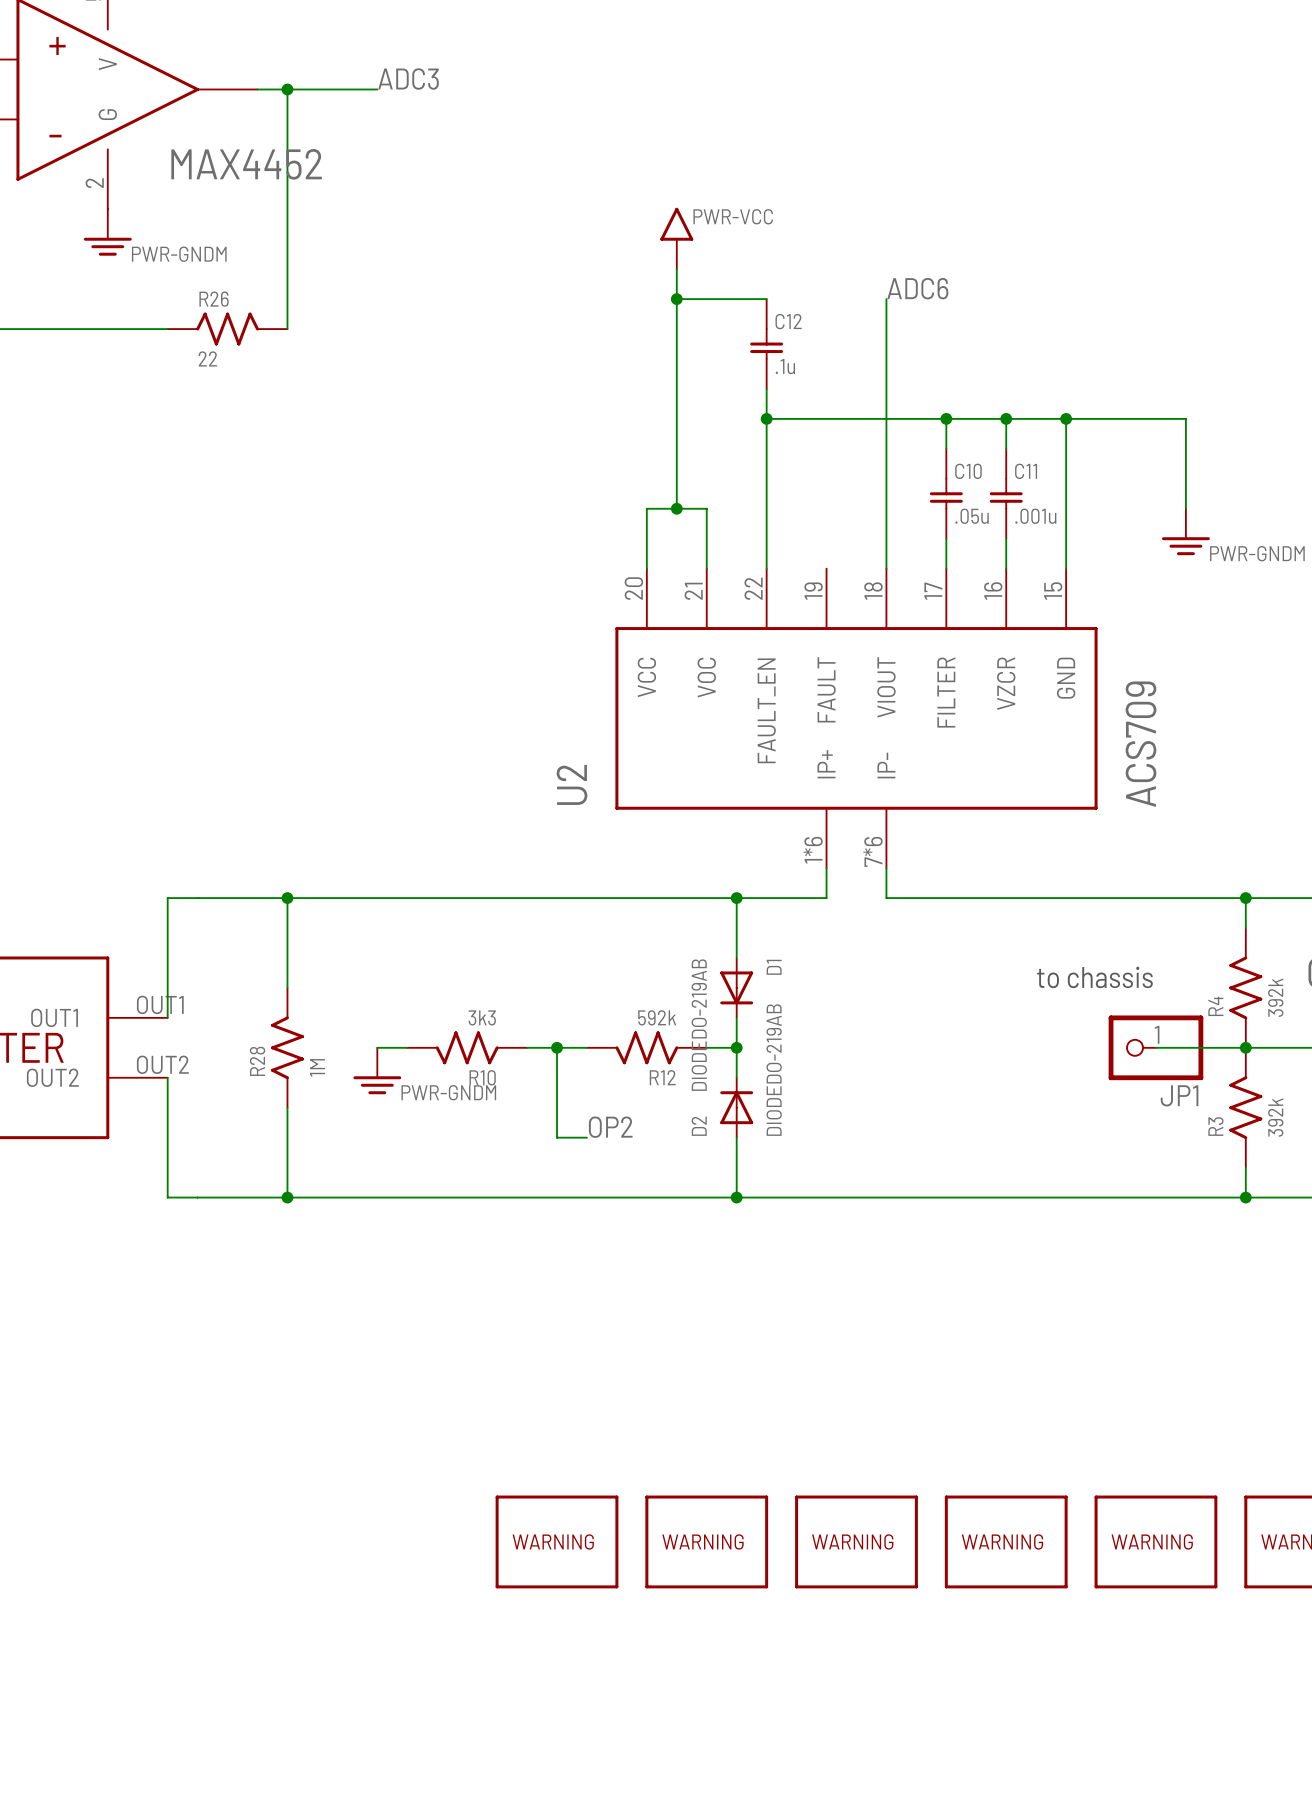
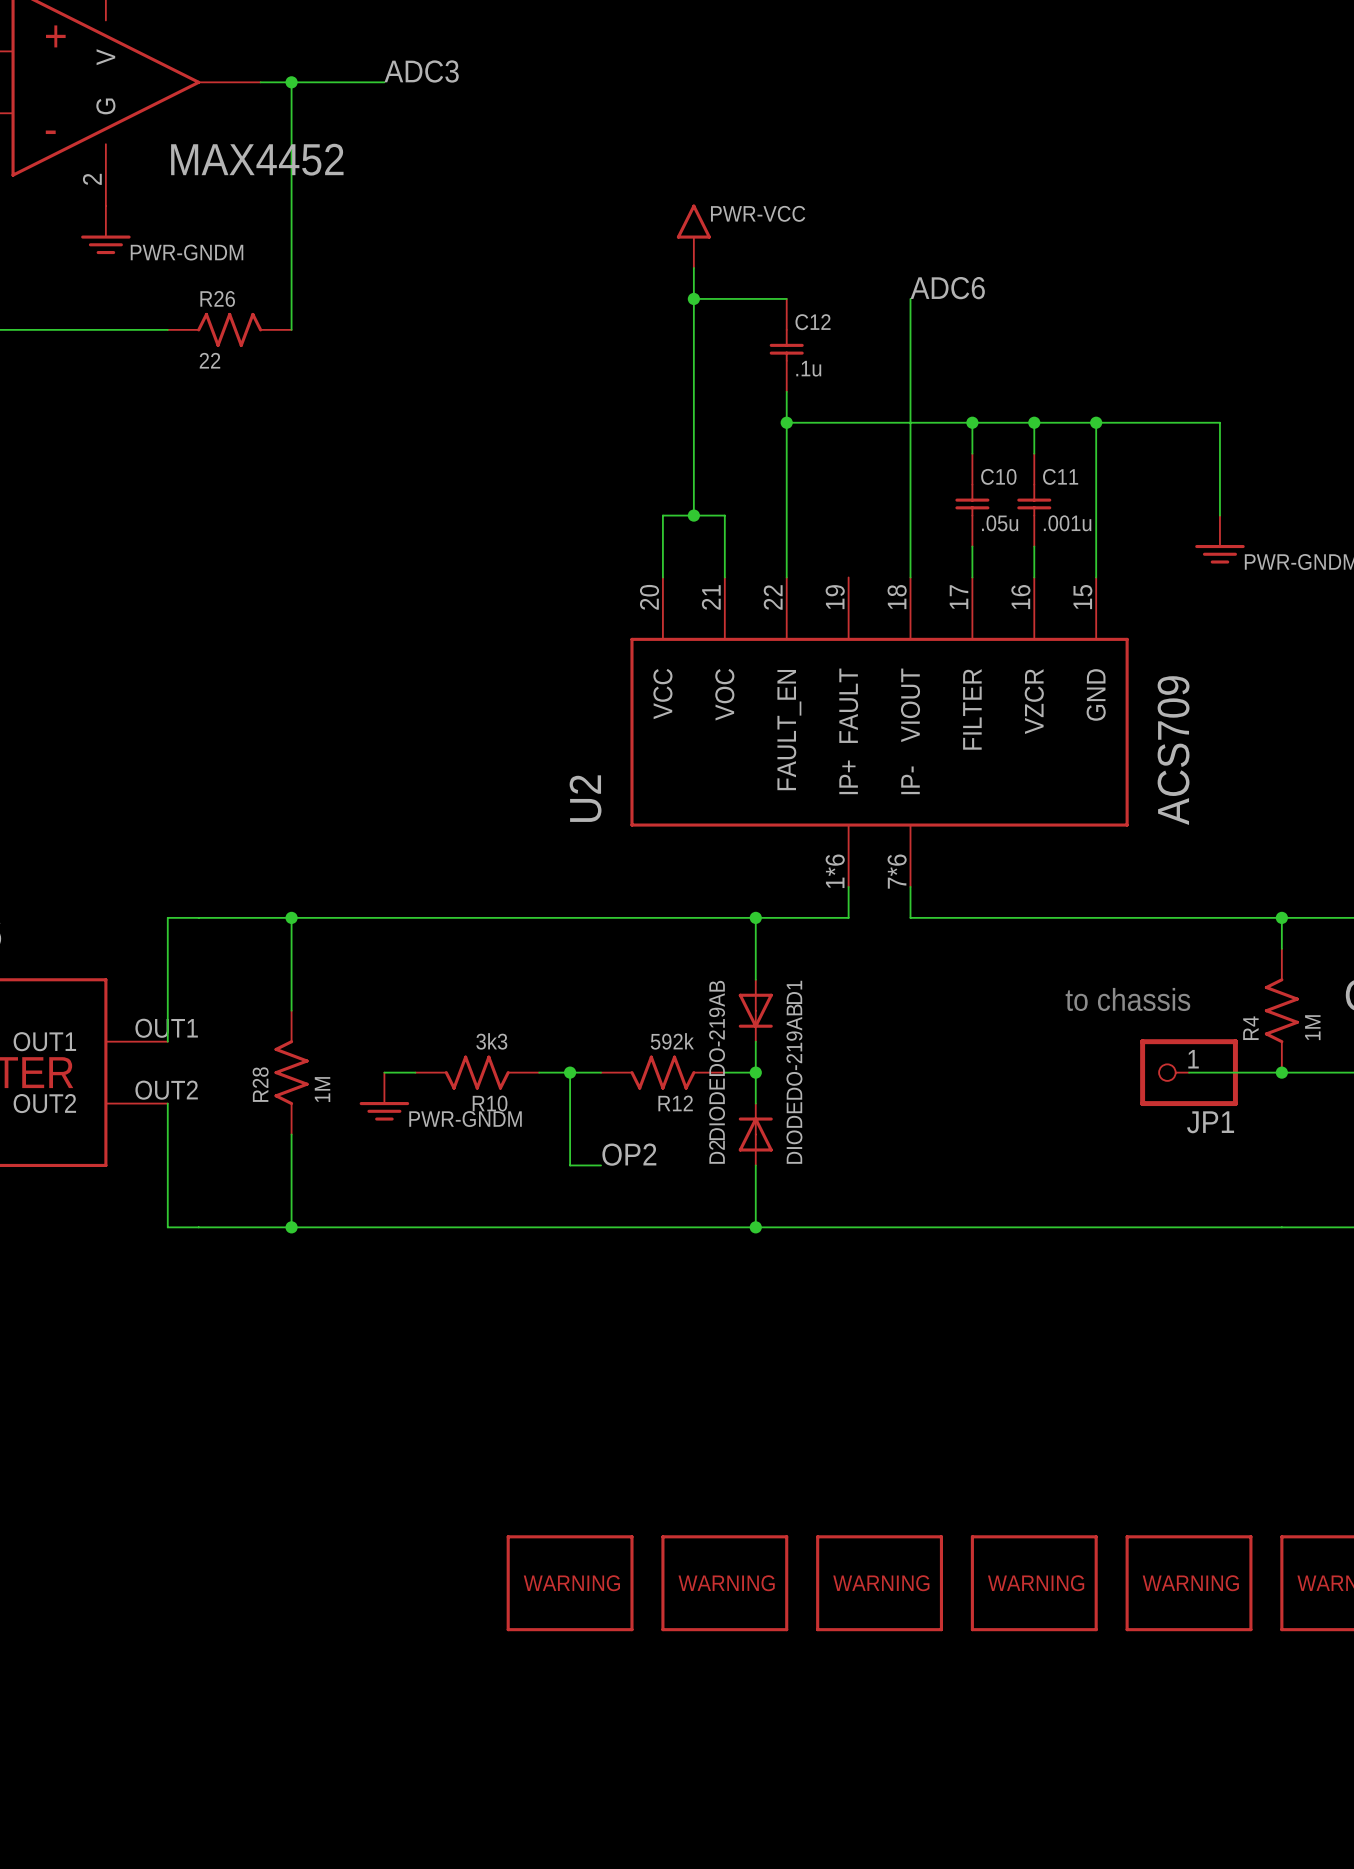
R4 value: 392k (1275, 997) -> 1M (1312, 1027)
R3: 392k (1245, 1107) -> none
wire: (1245, 1167) (1245, 1197) -> none
junction: (1245, 1197) -> none

